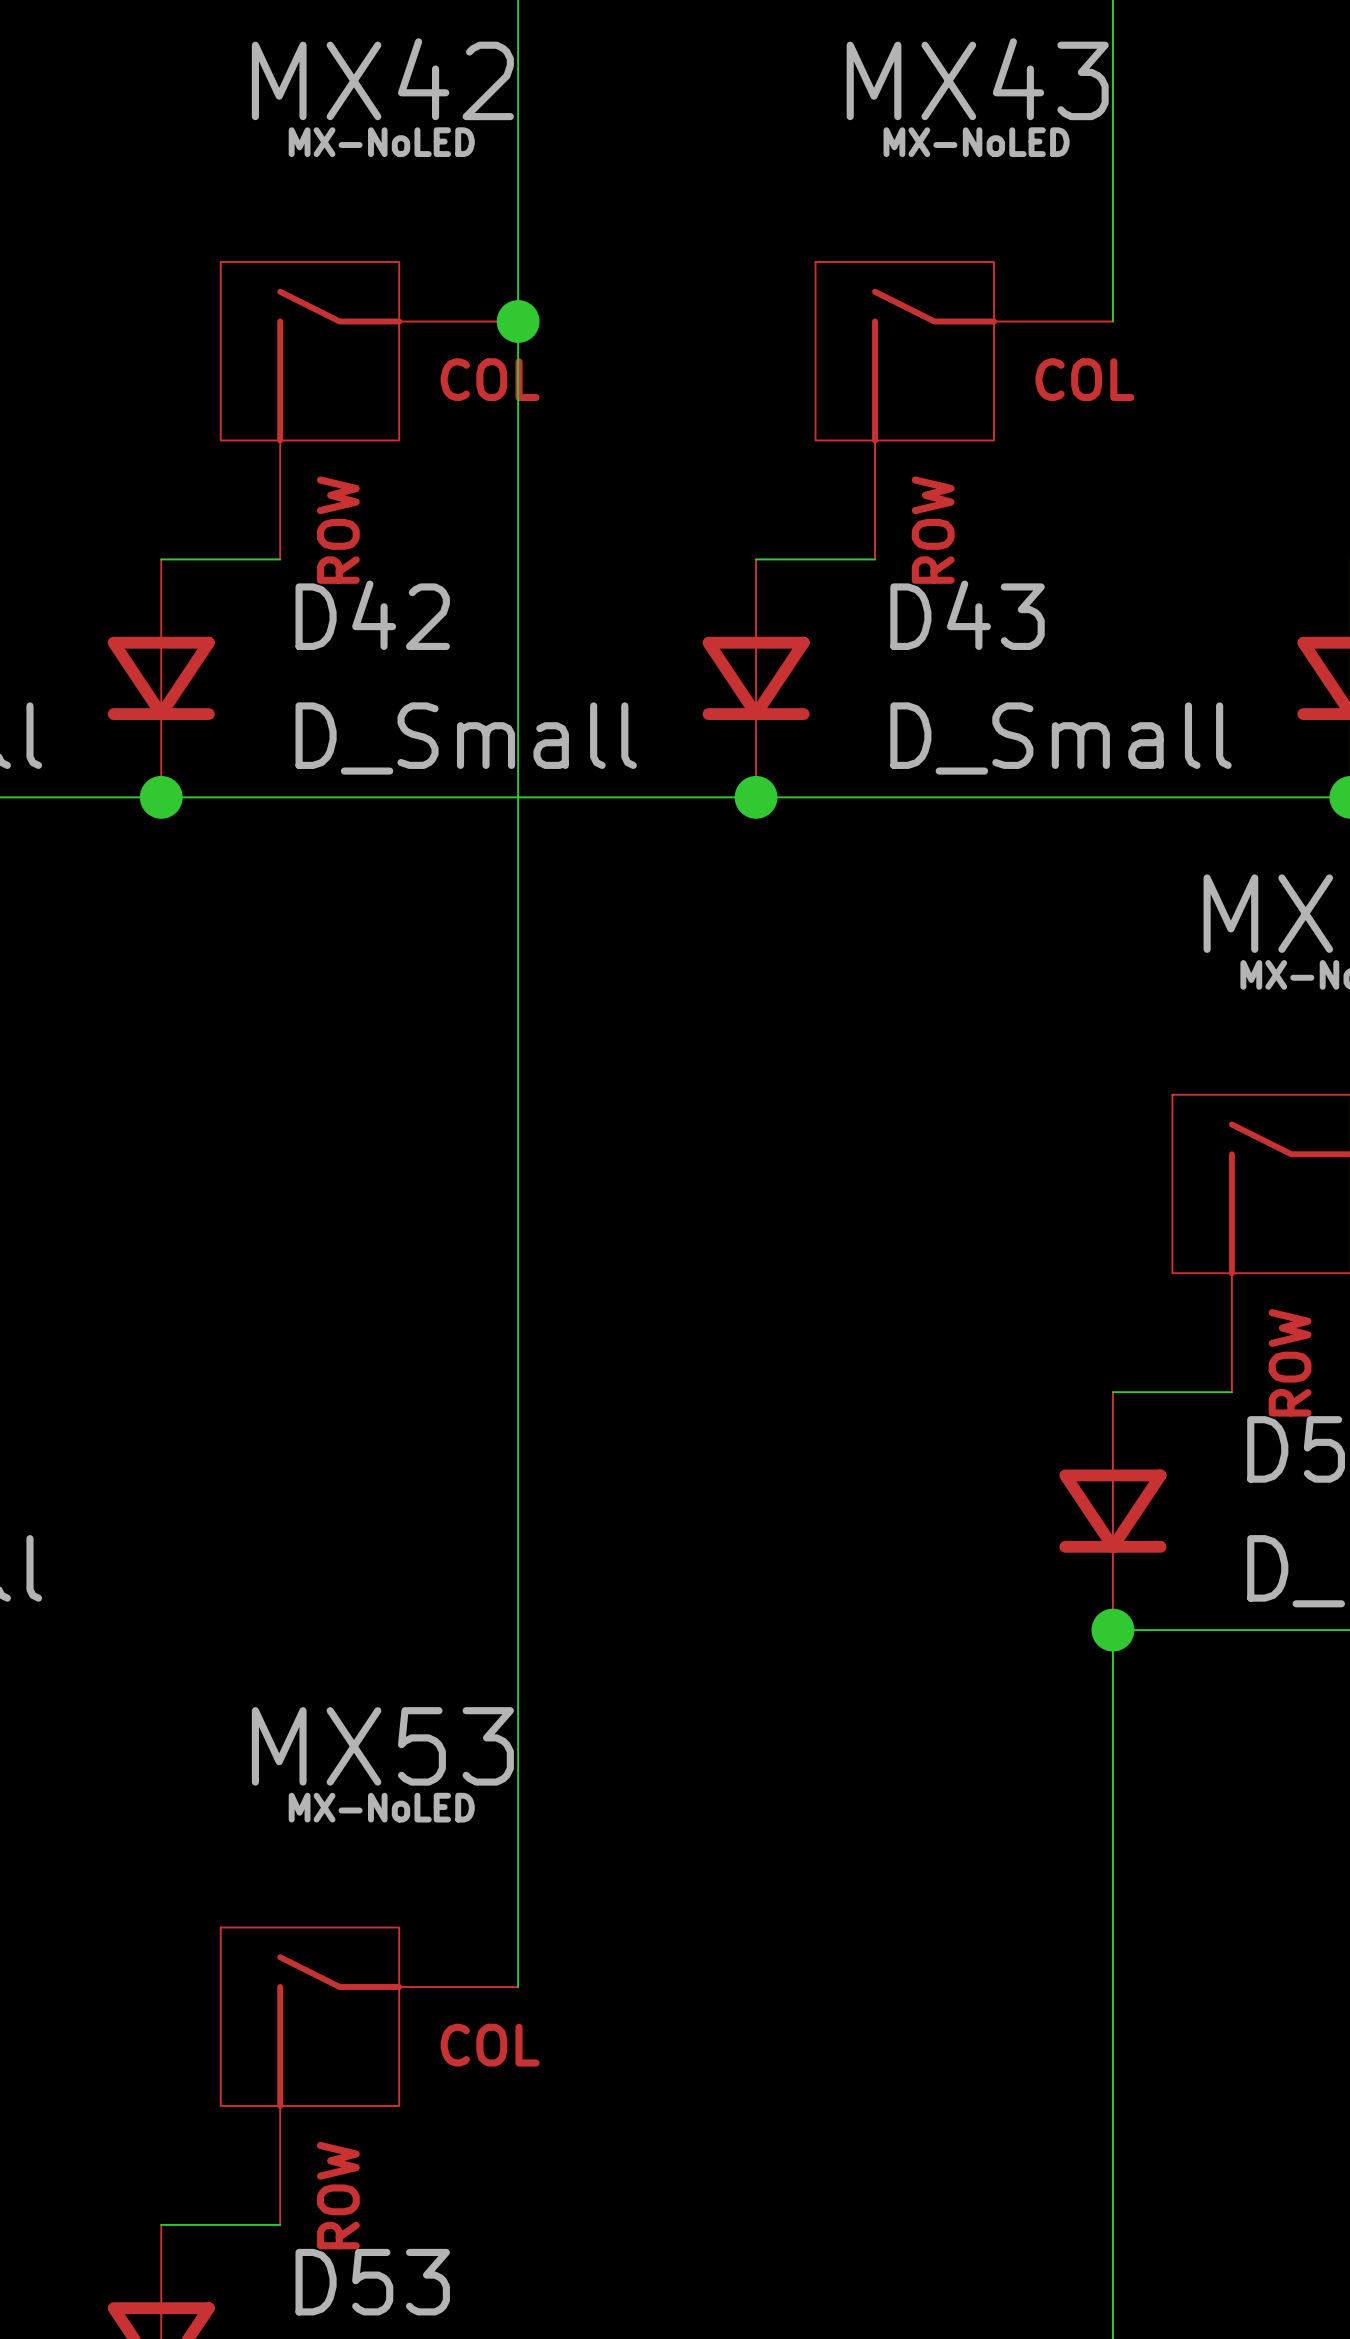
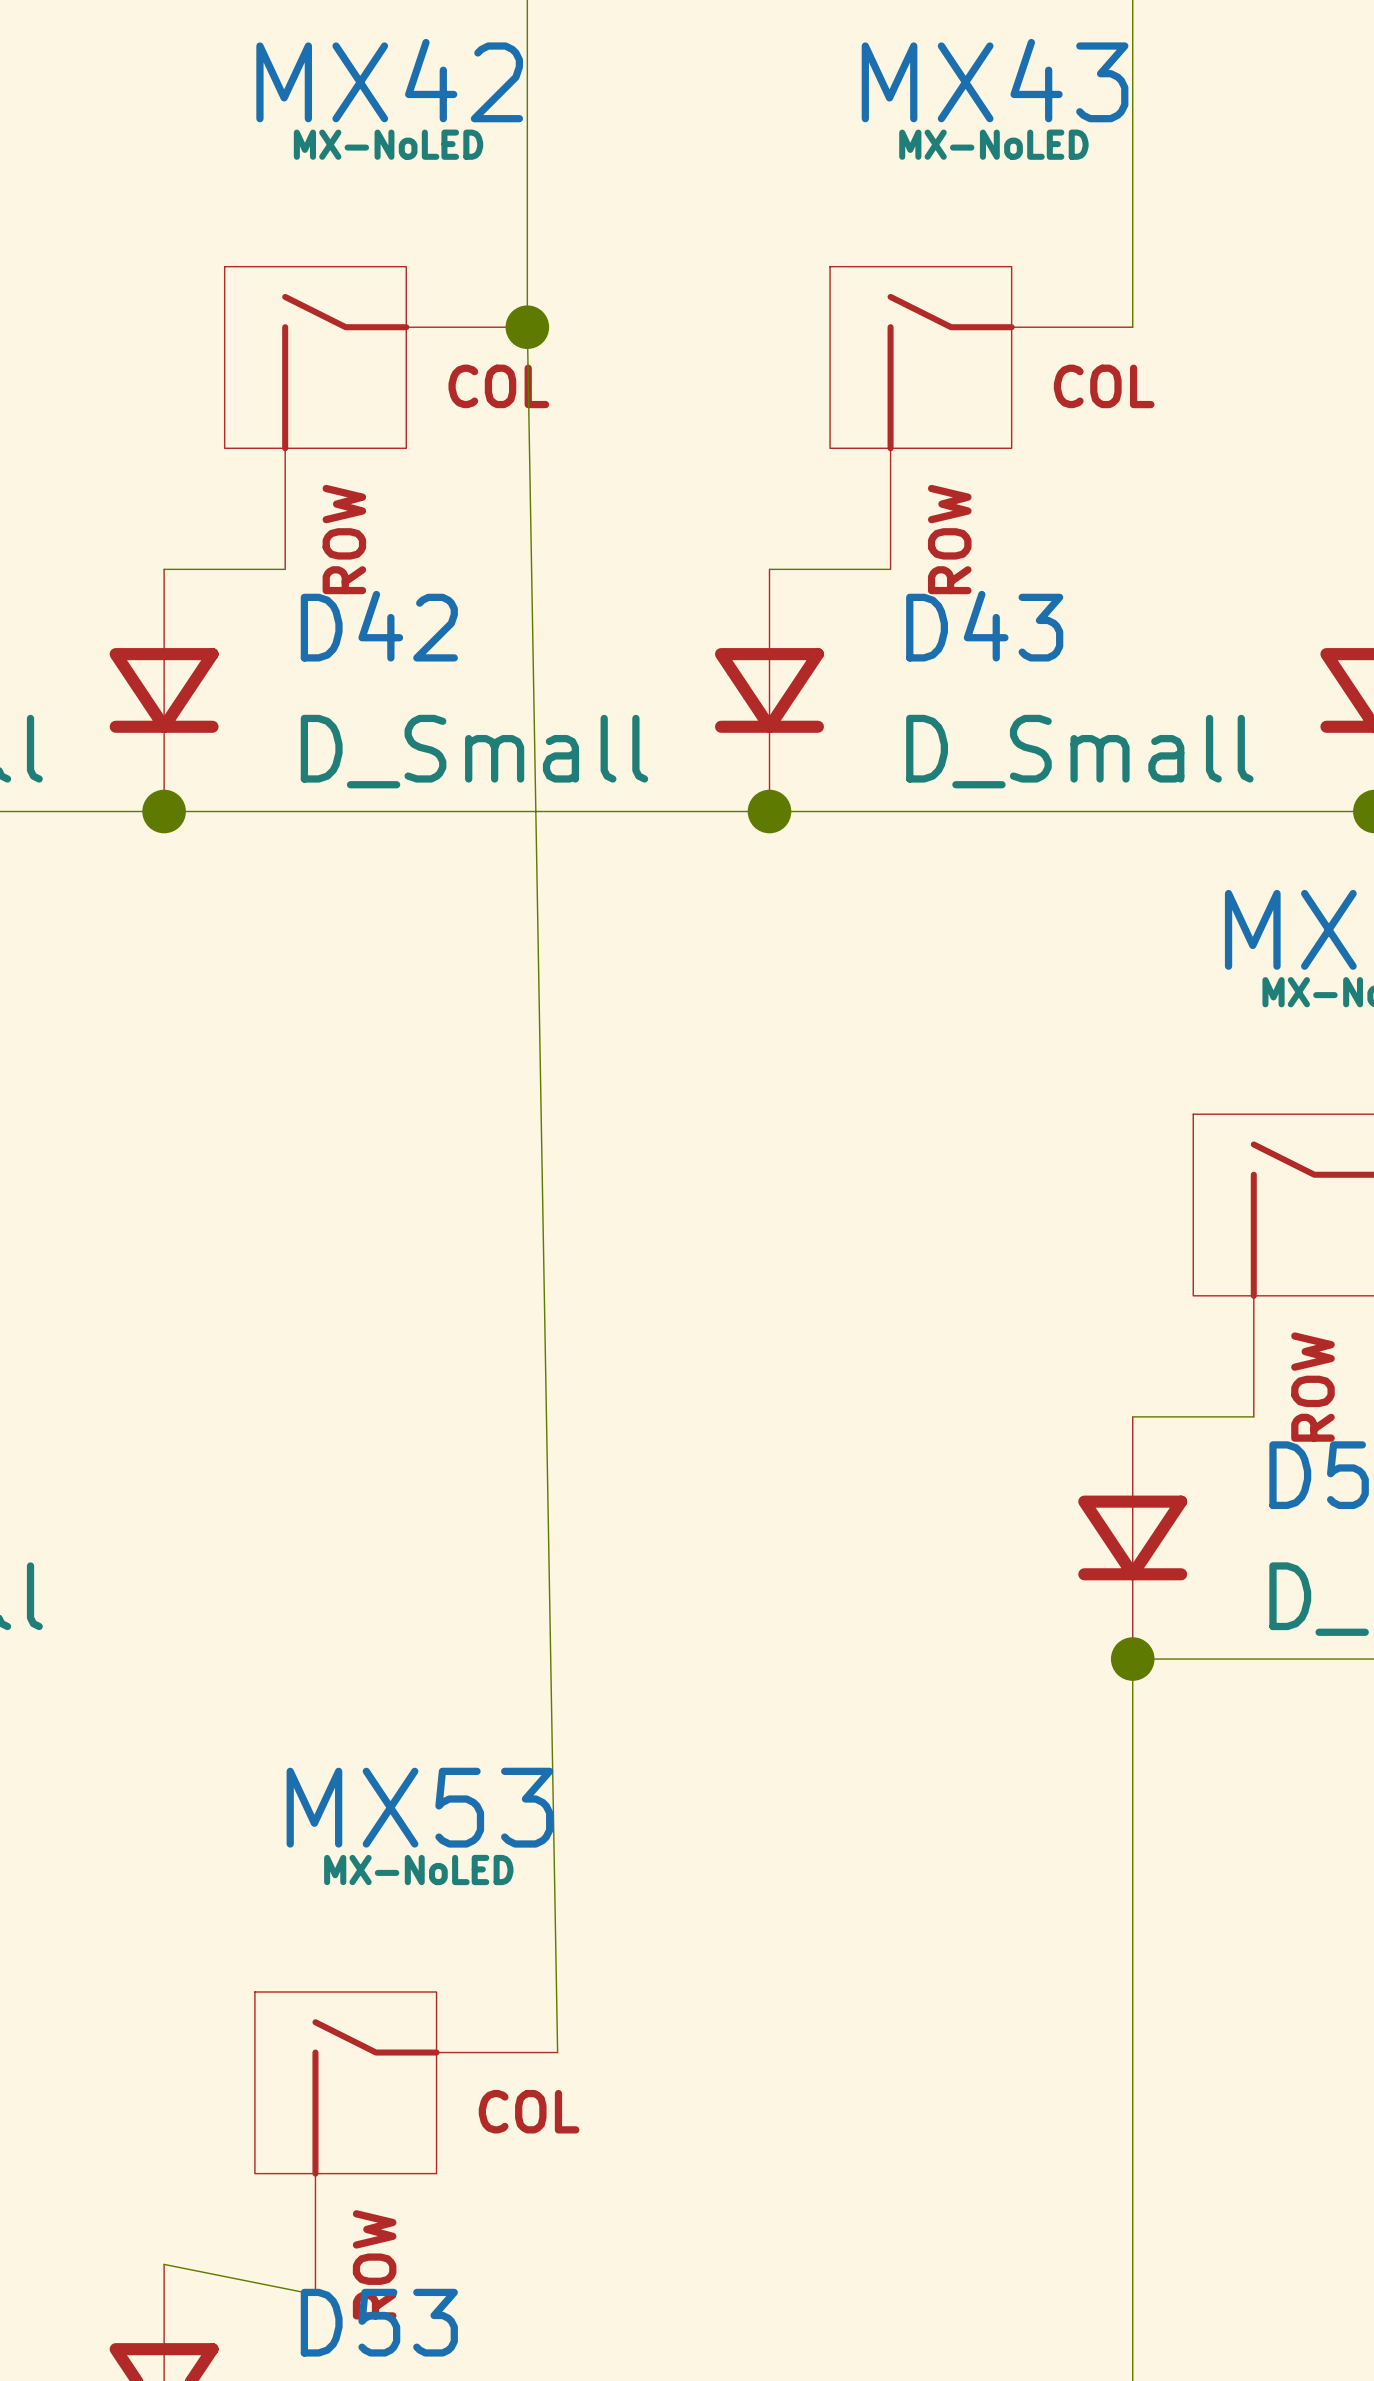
wire: (518, 321) (518, 1986) -> (527, 327) (557, 2052)
MX53 position: (369, 2076) -> (406, 2143)
wire: (161, 2224) (280, 2224) -> (164, 2264) (315, 2294)

